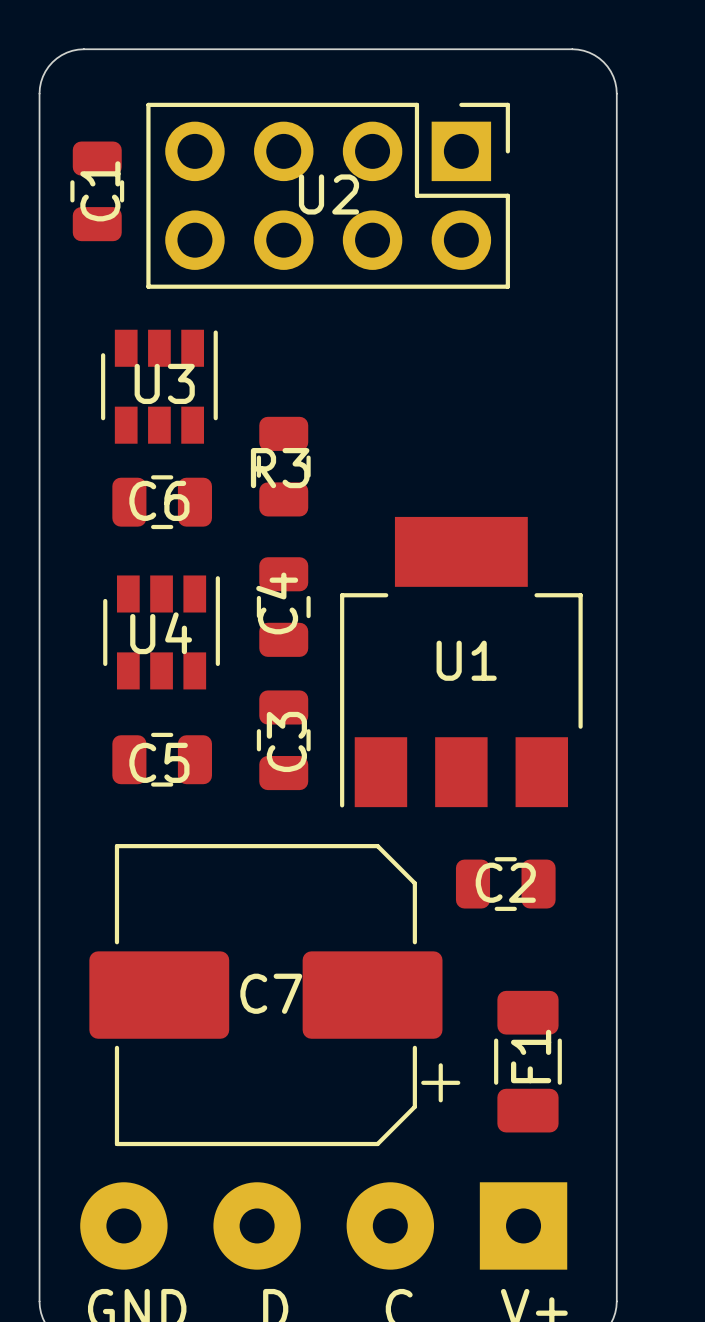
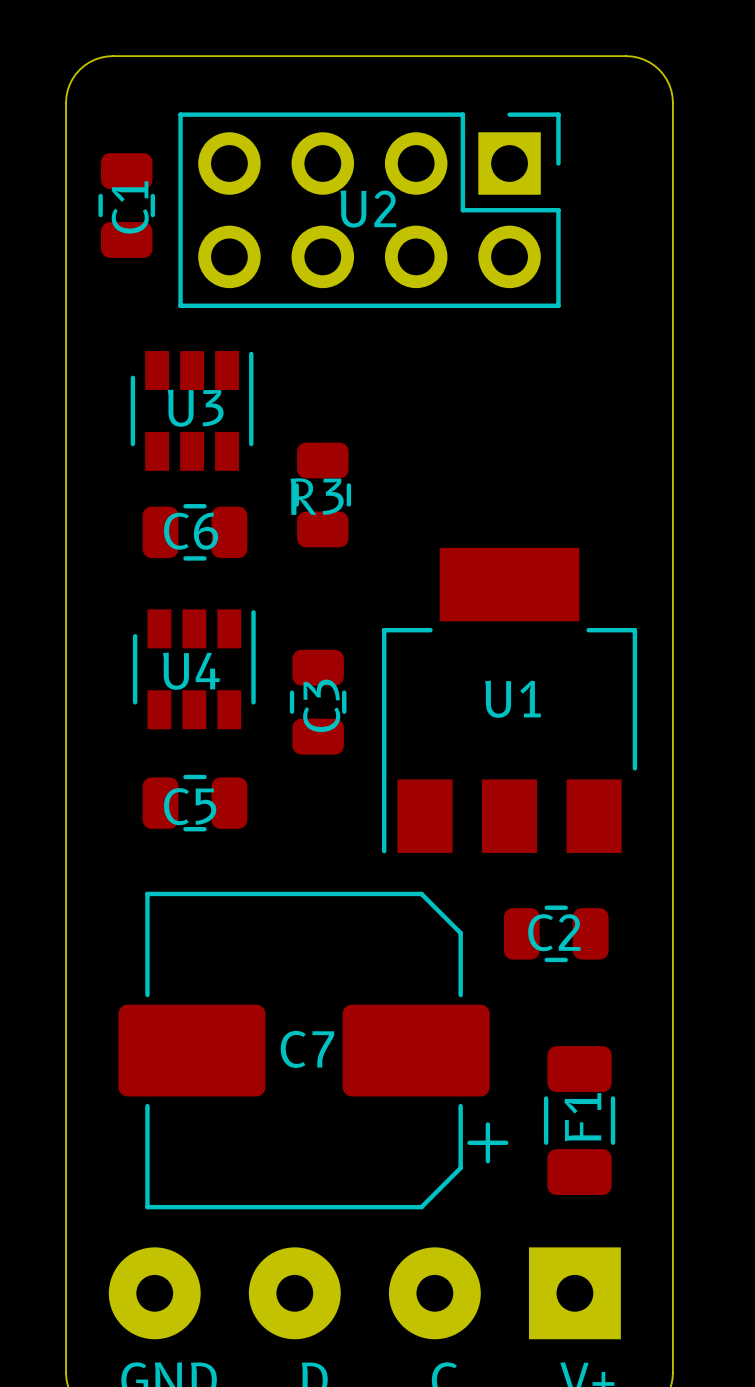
C4: (283, 607) -> none
C3 position: (283, 740) -> (318, 702)

